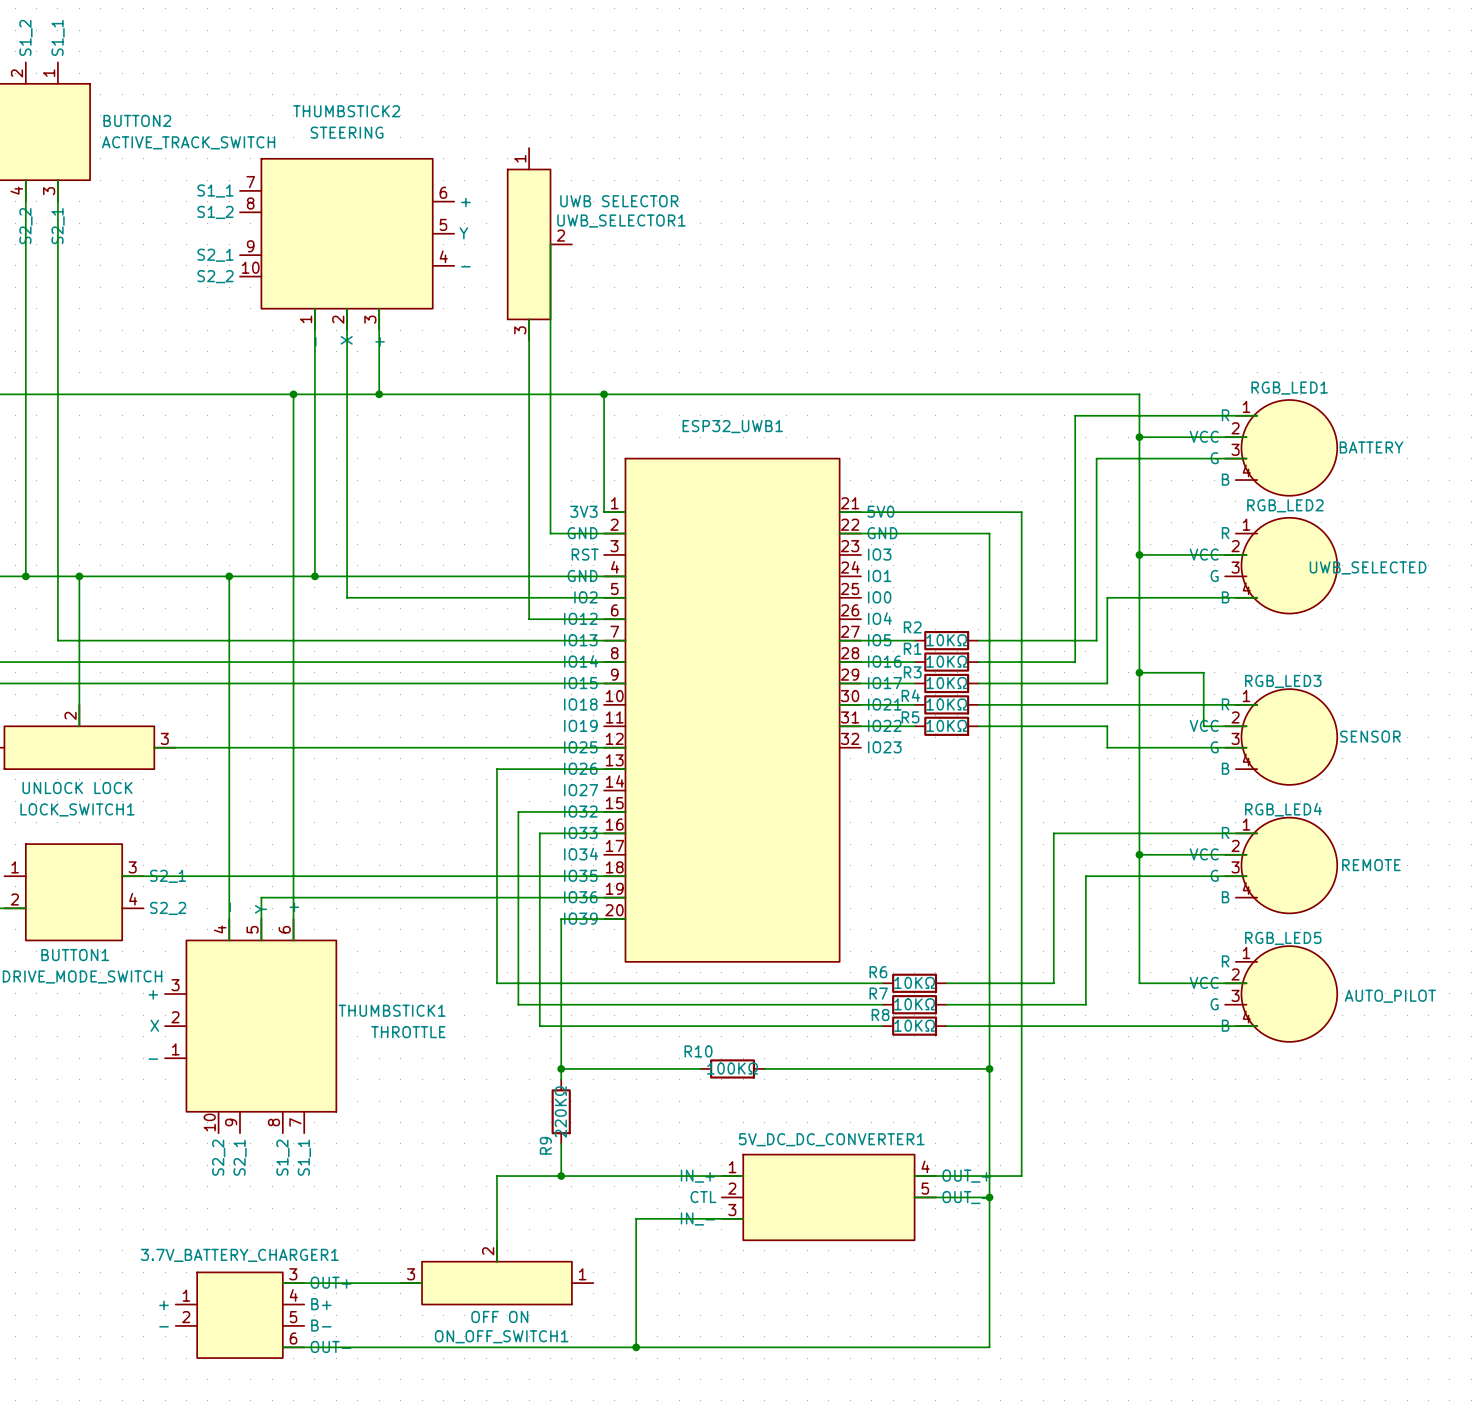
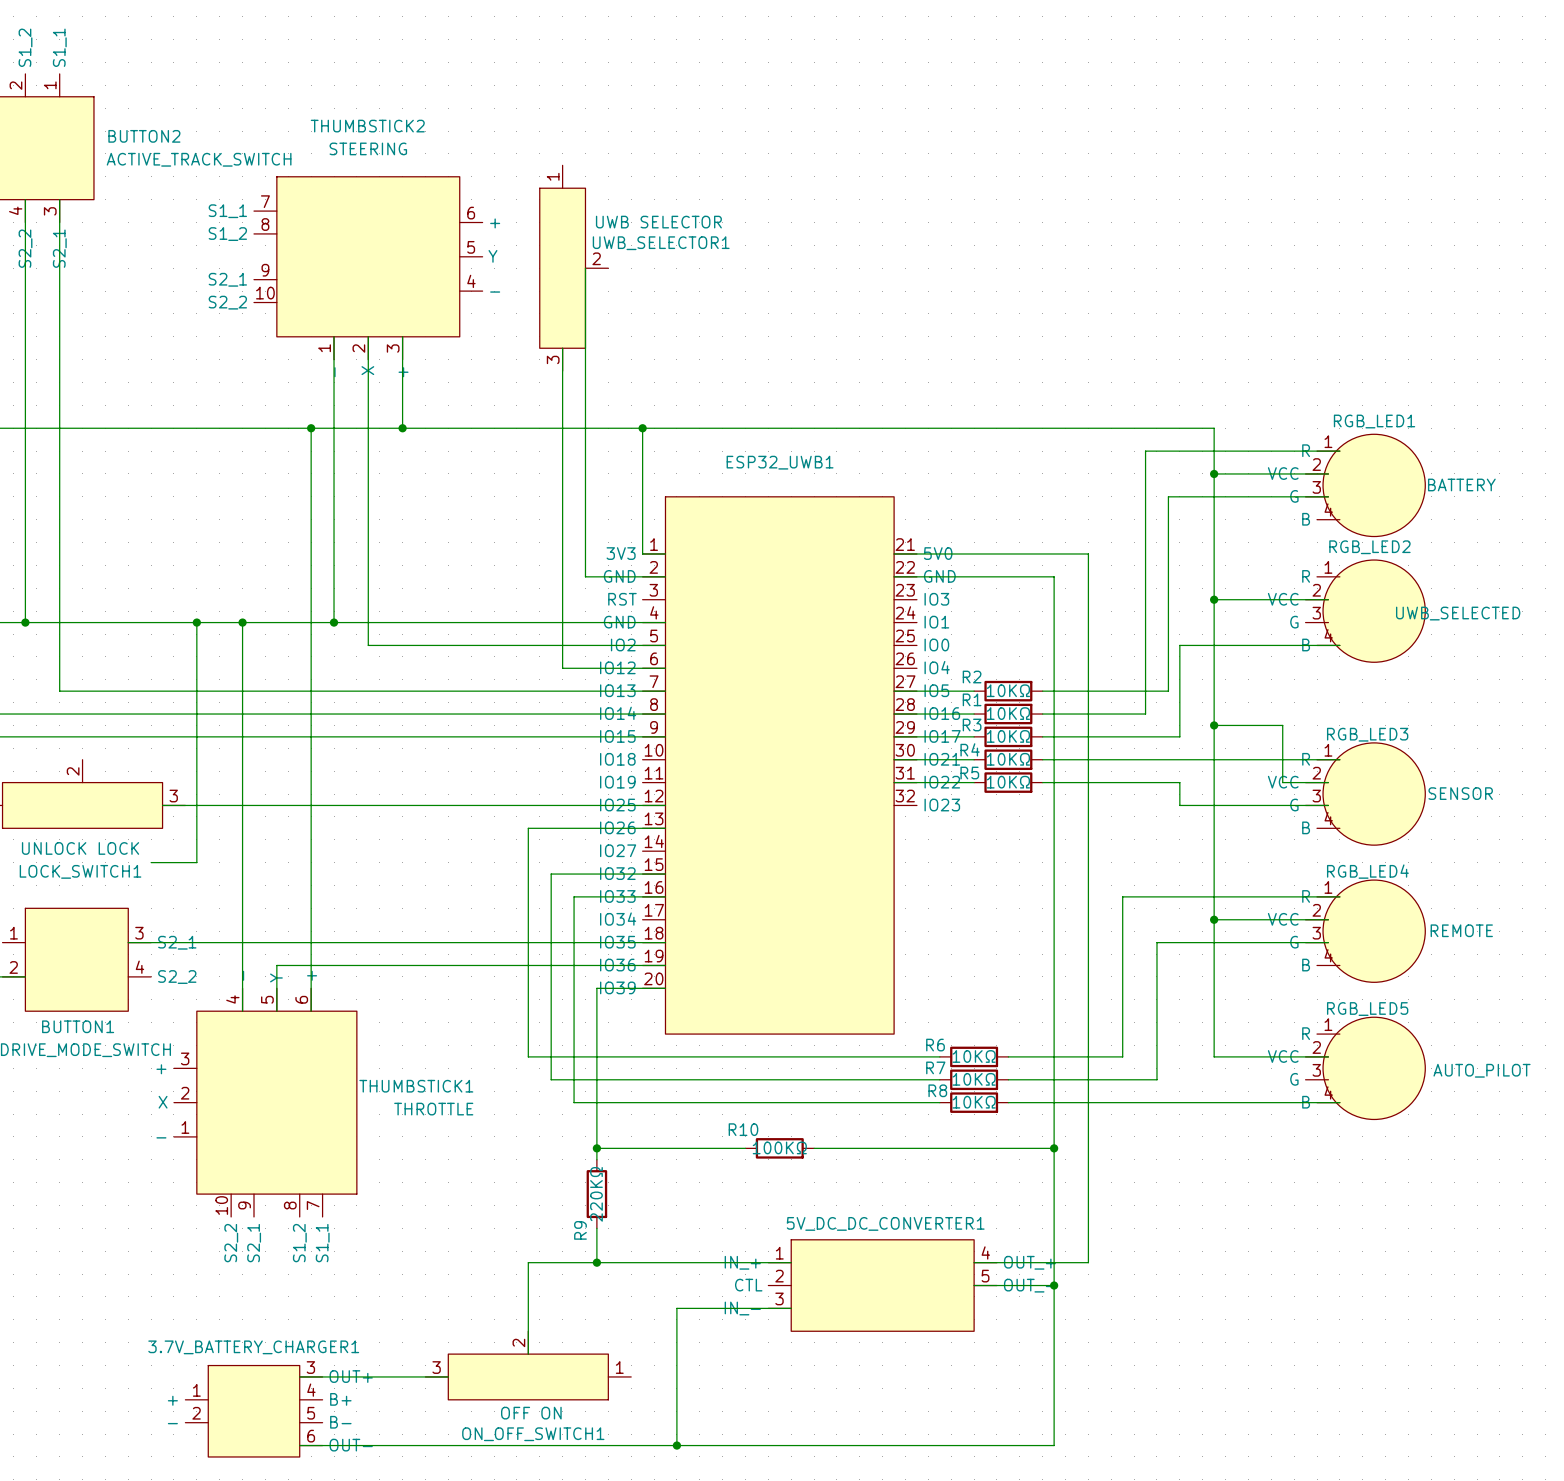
wire: (79, 576) (79, 726) -> none
junction: (79, 576) -> none
wire: none -> (196, 622) (196, 862) (151, 862)
junction: none -> (196, 622)

